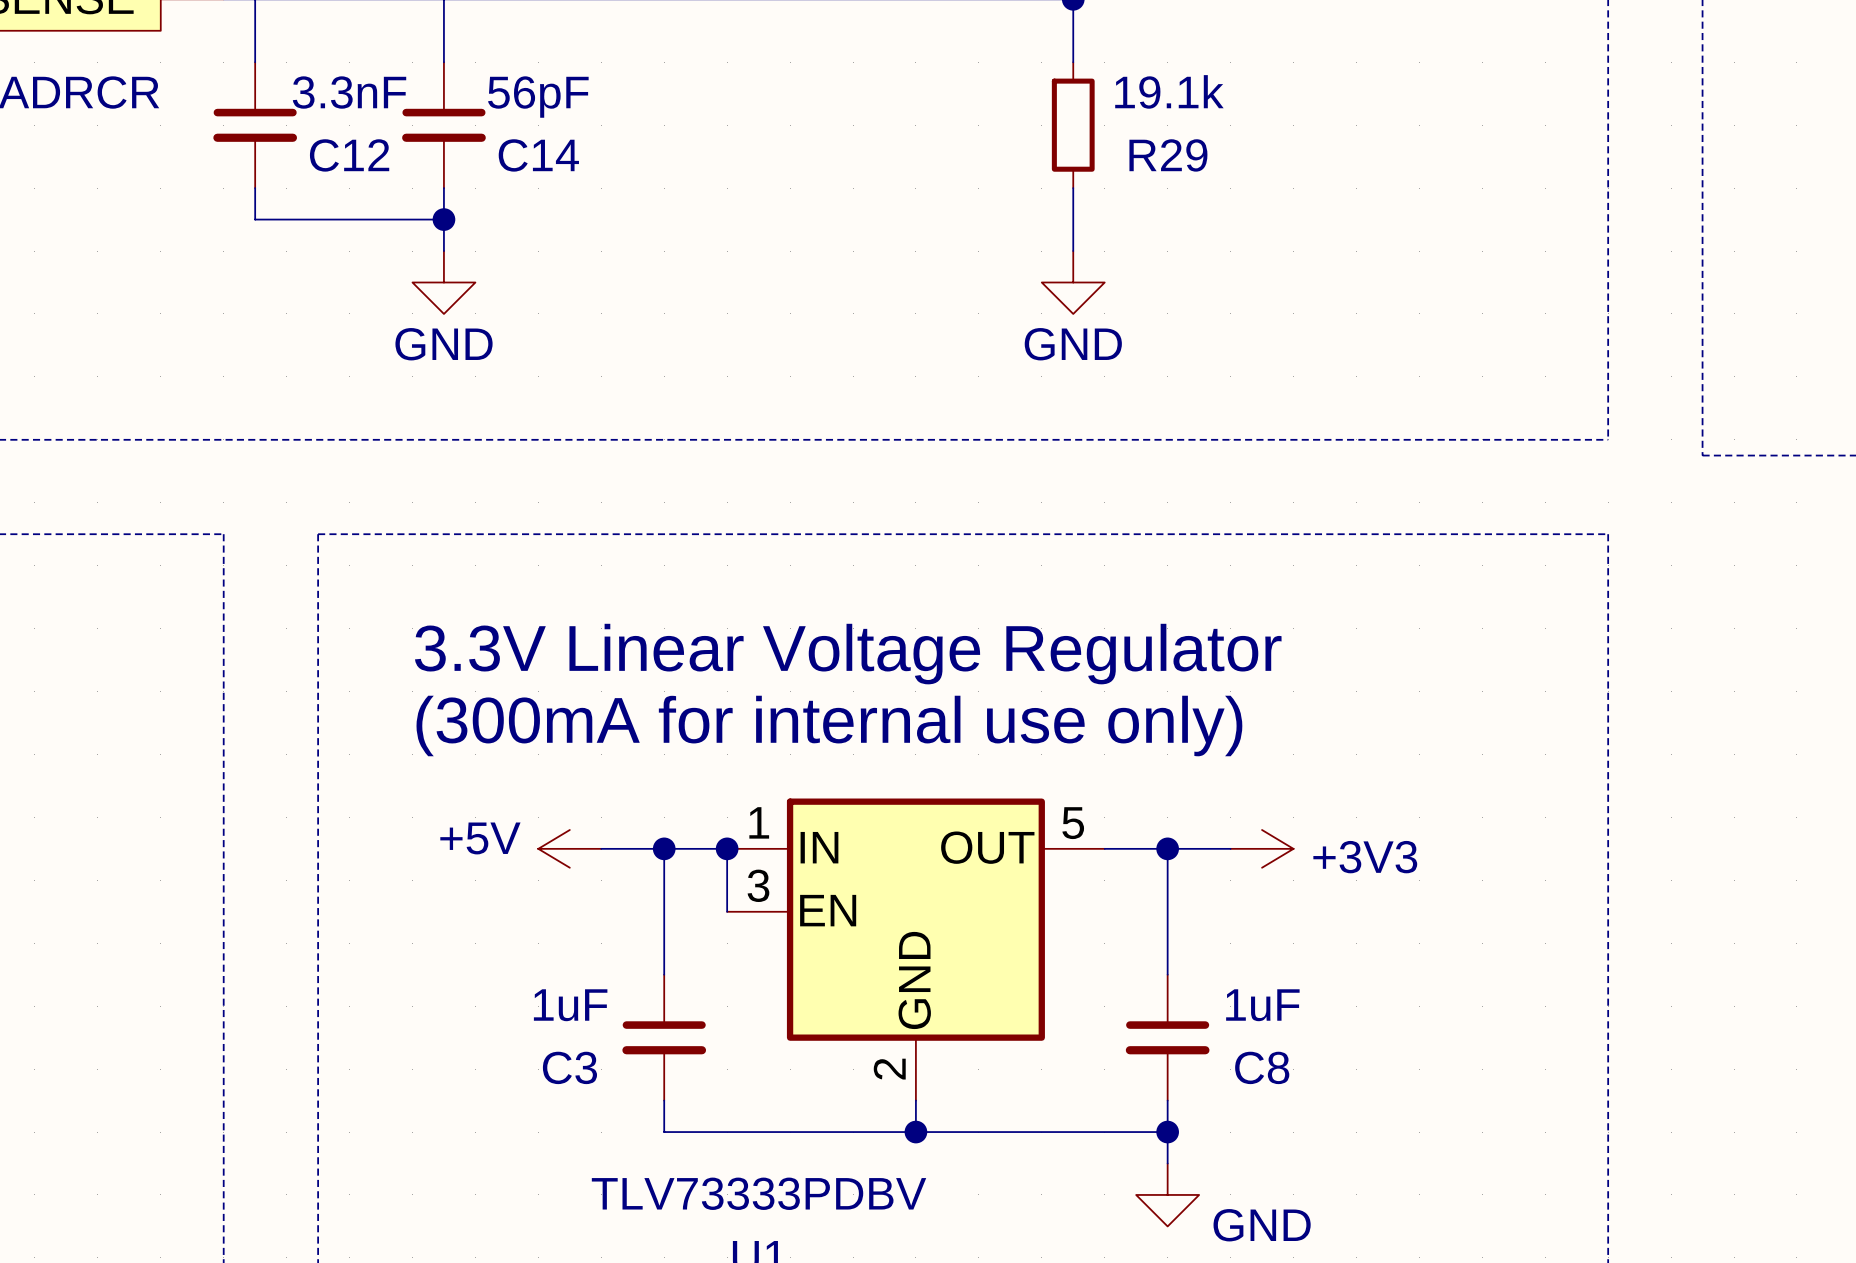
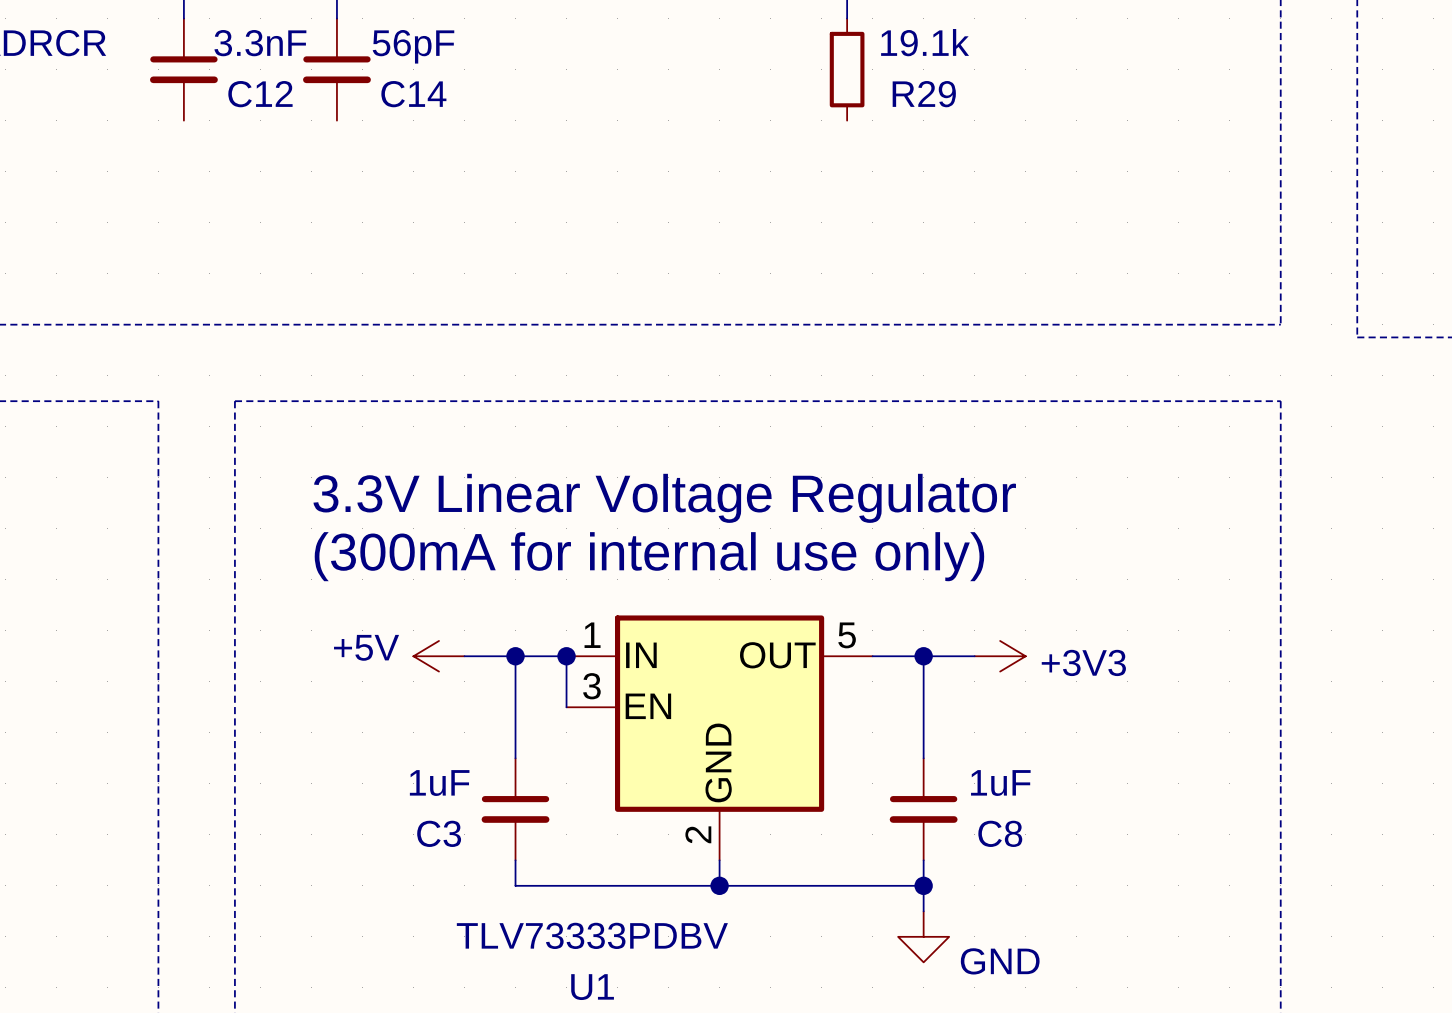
wire: (255, 188) (255, 219) (443, 219) -> none
wire: (443, 188) (443, 251) -> none
wire: (1073, 188) (1073, 251) -> none
junction: (443, 219) -> none
power symbol: GND (443, 282) -> none
power symbol: GND (1073, 282) -> none

